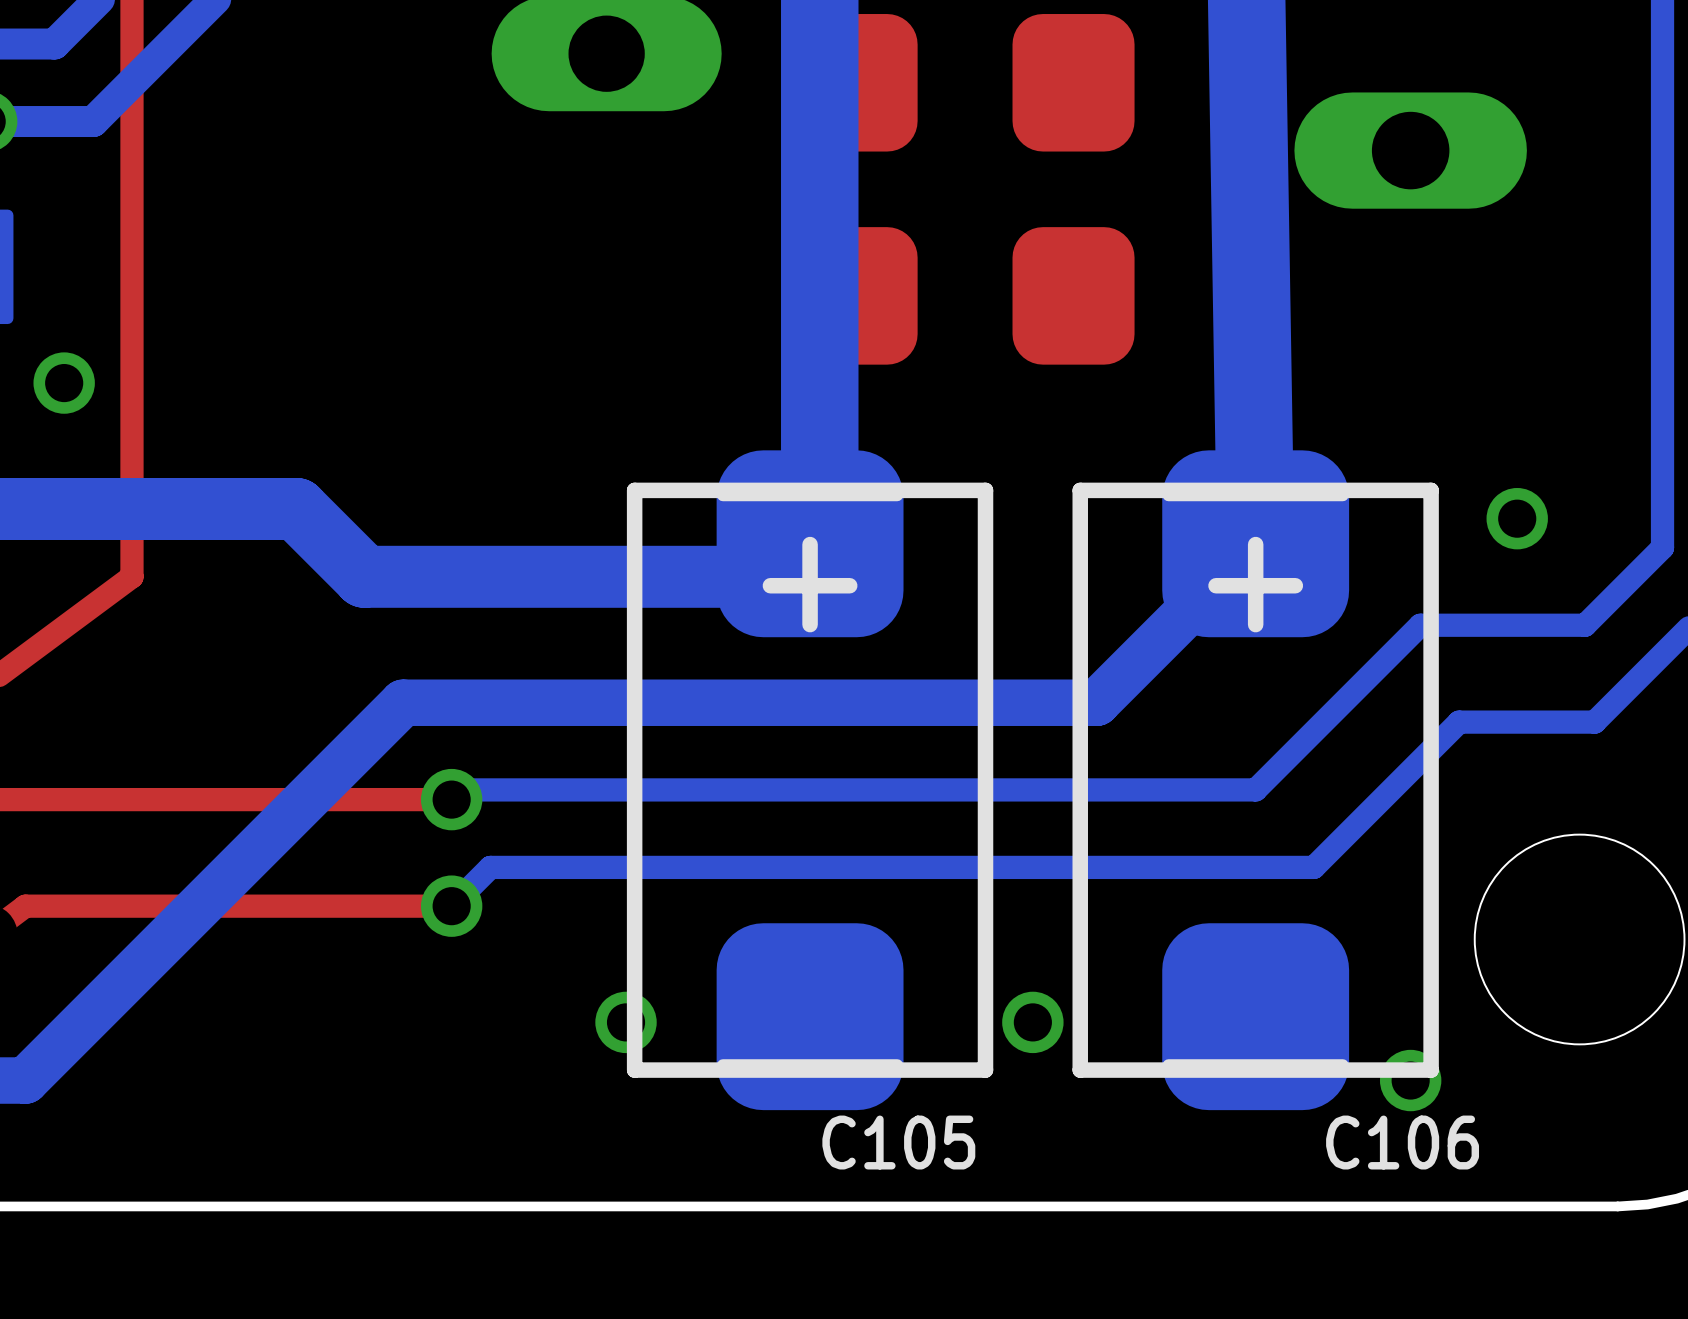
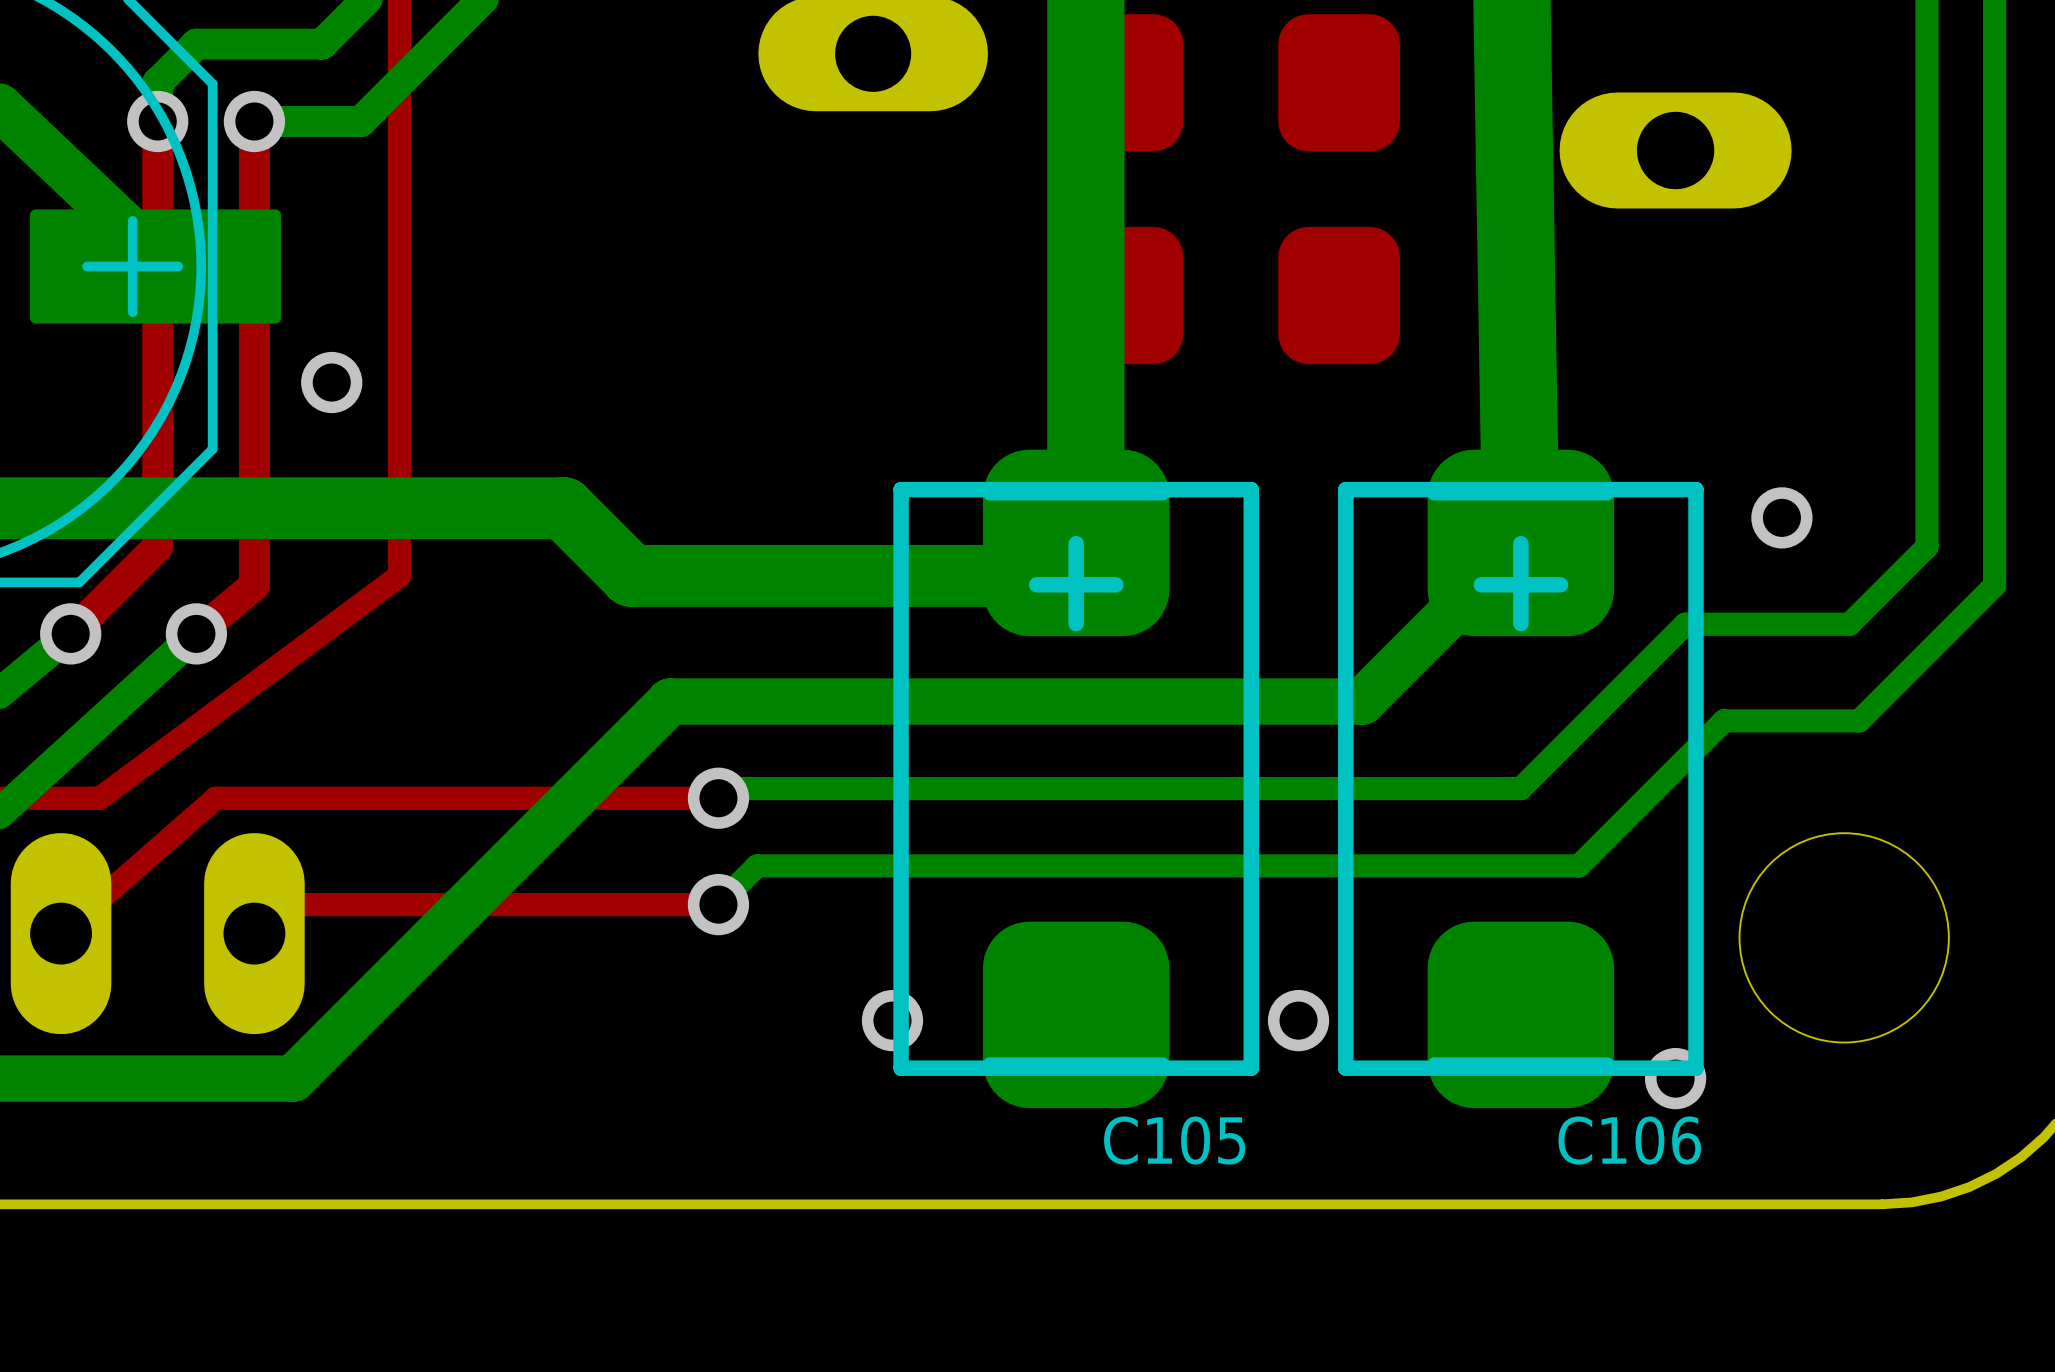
C106 name position: C106 (1402, 1142) -> C106 (1629, 1140)

